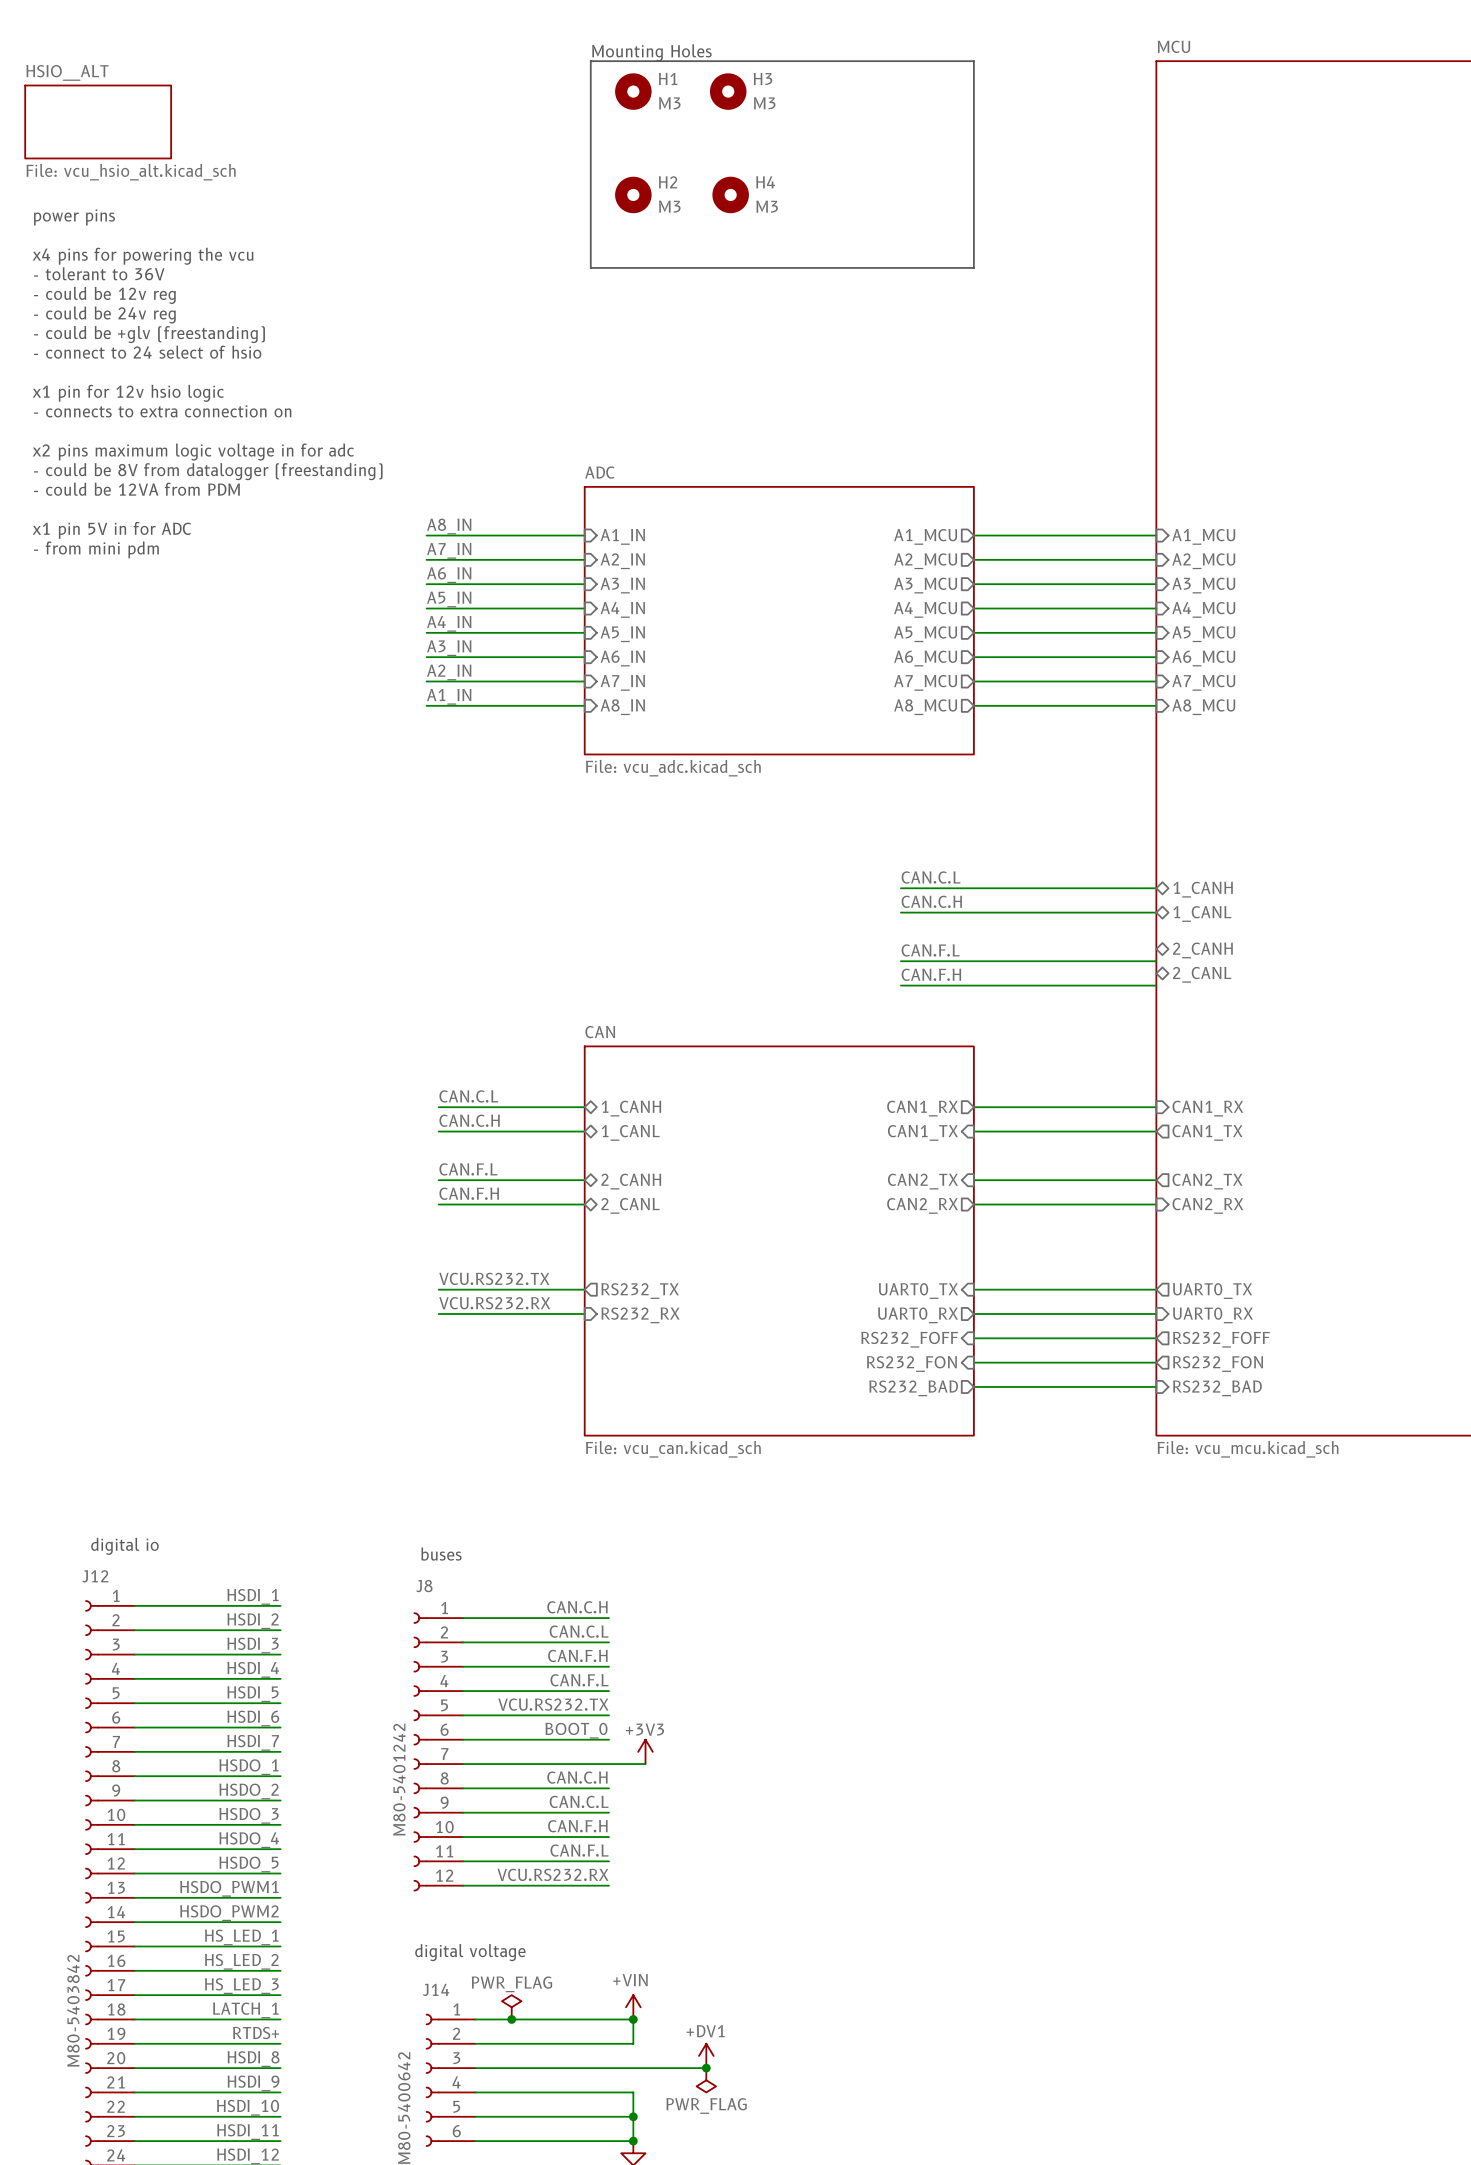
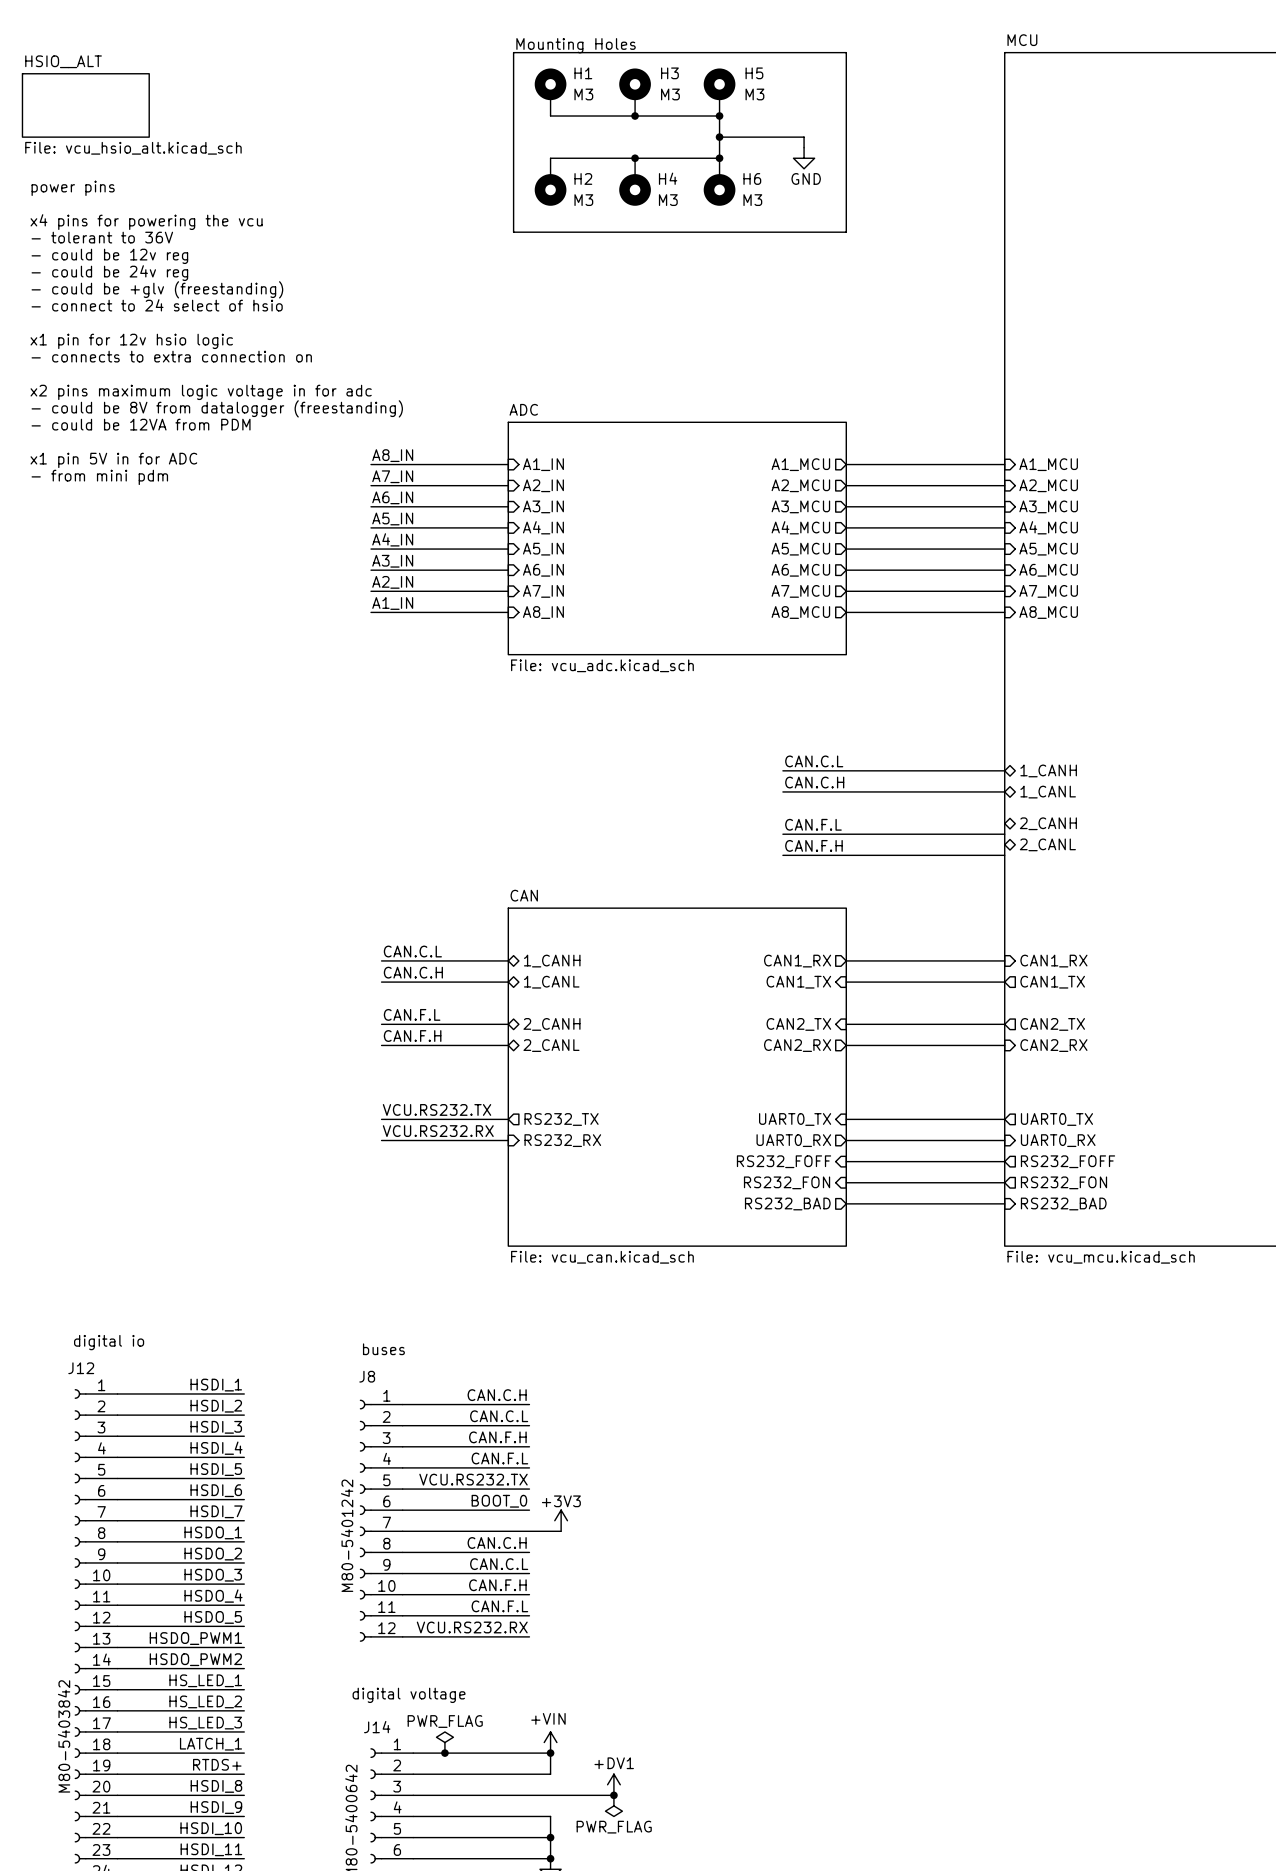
H1 symbol: [615, 73, 652, 110] -> [534, 68, 567, 117]
H3 symbol: [709, 73, 747, 110] -> [619, 68, 651, 117]
H5: none -> M3 (719, 92)
wire: none -> (550, 116) (719, 116) (719, 158) (550, 158)
junction: none -> (635, 116)
junction: none -> (719, 116)
wire: none -> (719, 137) (804, 137) (804, 147)
junction: none -> (719, 137)
H2 symbol: [615, 176, 652, 214] -> [534, 158, 567, 206]
H4 symbol: [712, 176, 749, 214] -> [619, 158, 651, 206]
junction: none -> (635, 158)
junction: none -> (719, 158)
power symbol: none -> GND (804, 158)
H6: none -> M3 (719, 182)

